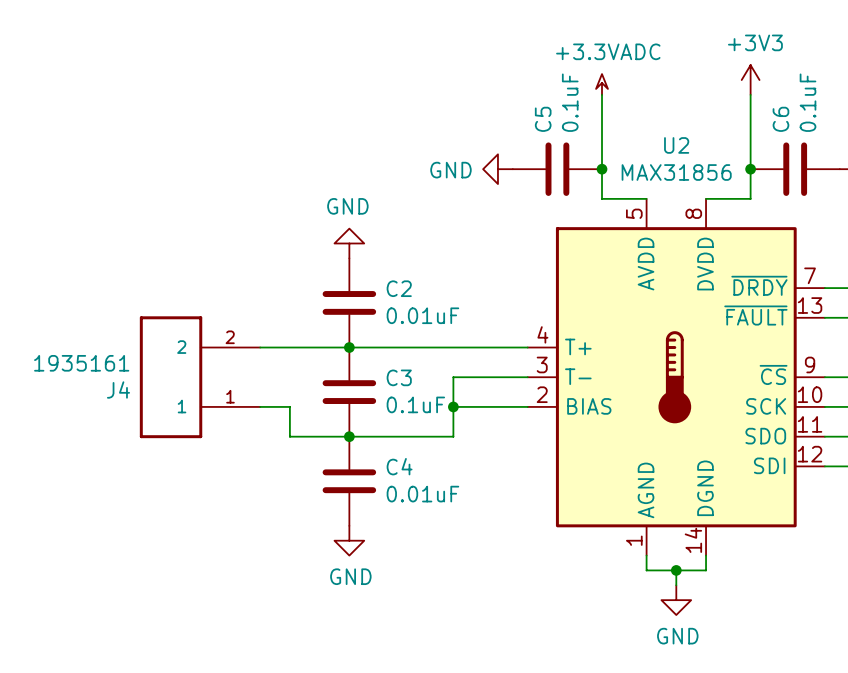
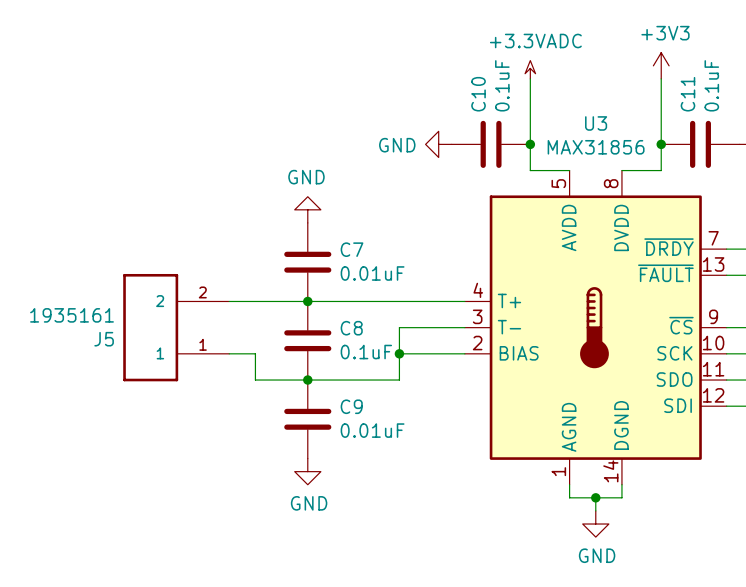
C5 name: C5 (543, 119) -> C10 (478, 94)
C6 name: C6 (780, 119) -> C11 (687, 94)
U2 name: U2 (676, 145) -> U3 (596, 123)
C2 name: C2 (399, 288) -> C7 (352, 249)
C3 name: C3 (399, 377) -> C8 (351, 328)
J4 name: J4 (118, 390) -> J5 (104, 339)
C4 name: C4 (399, 466) -> C9 (351, 406)

